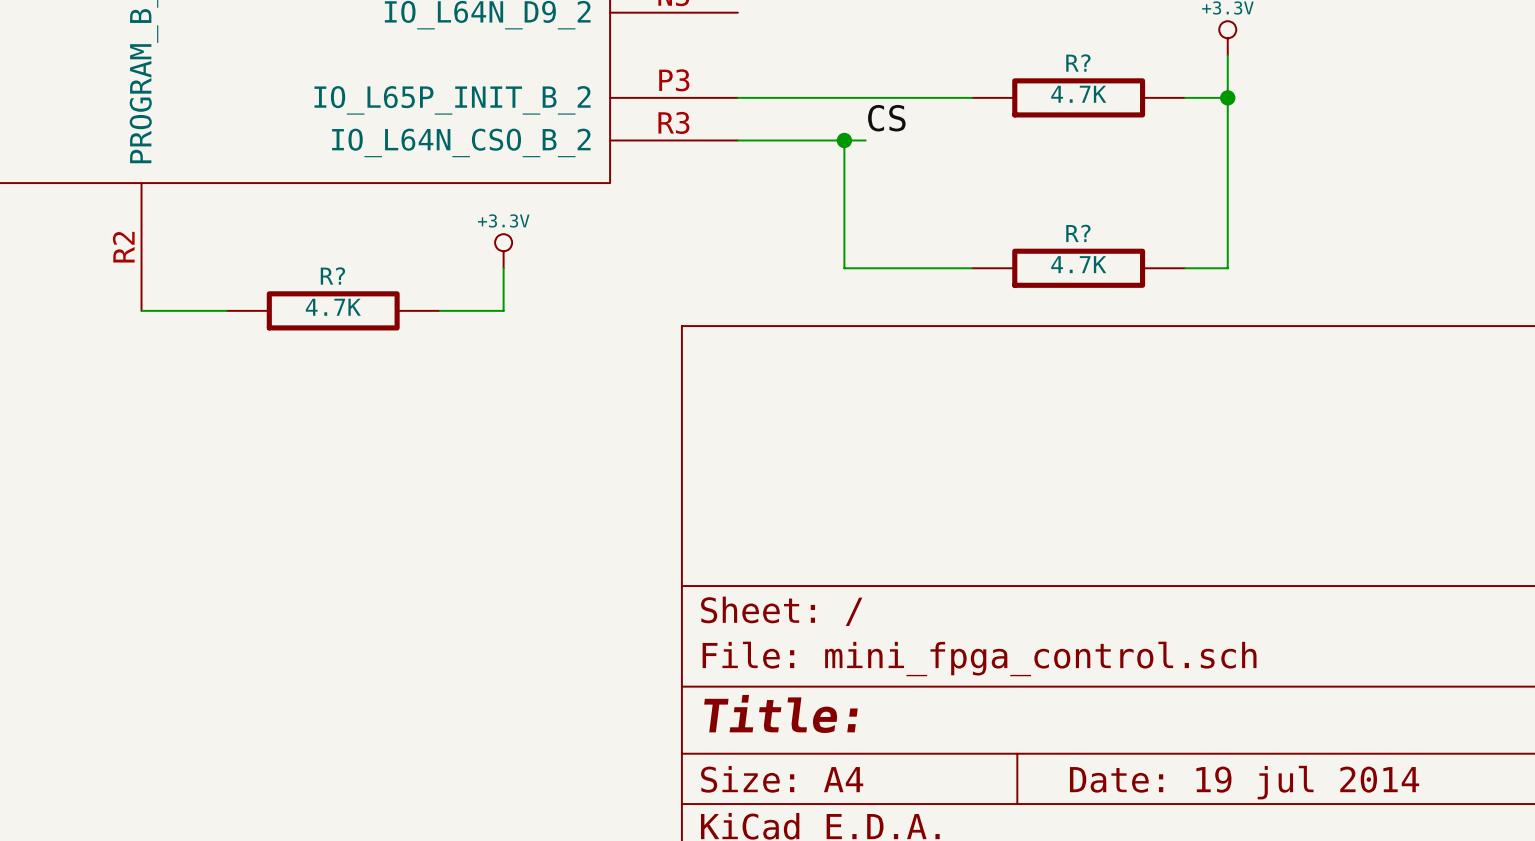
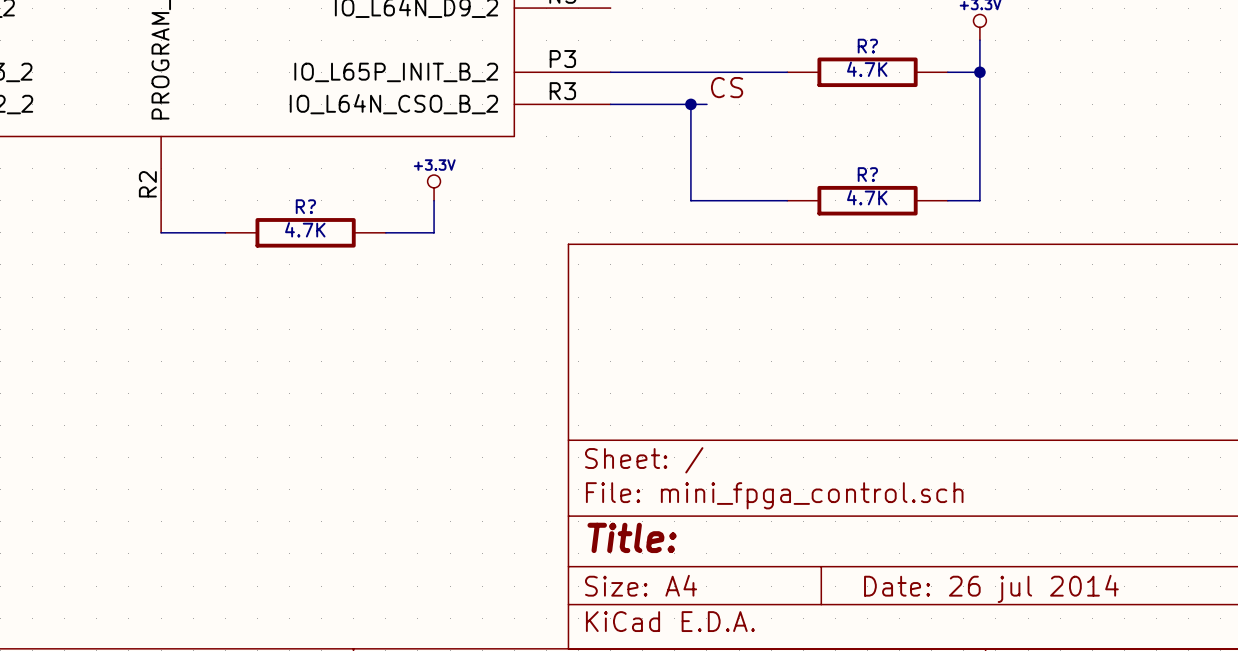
title block: Date: 19 jul 2014 (1244, 782) -> Date: 26 jul 2014 (991, 588)

